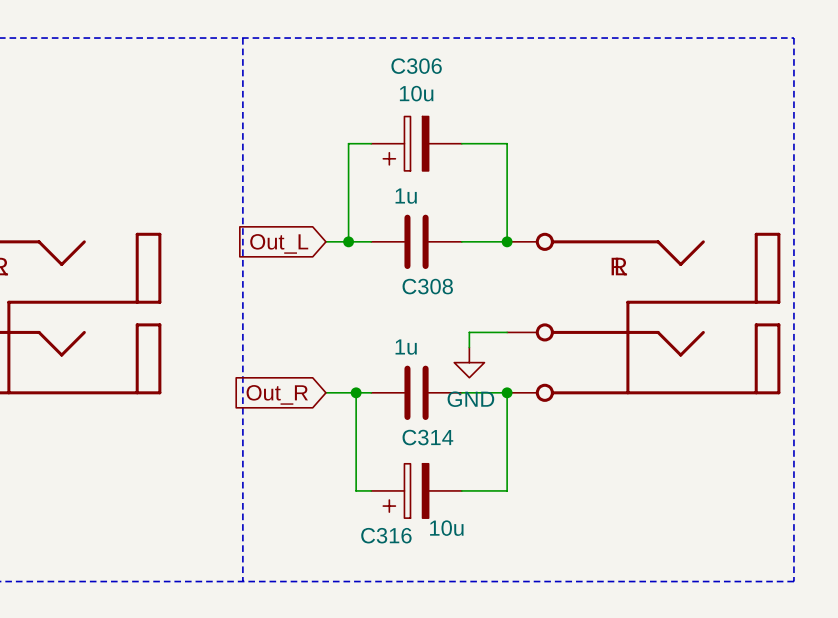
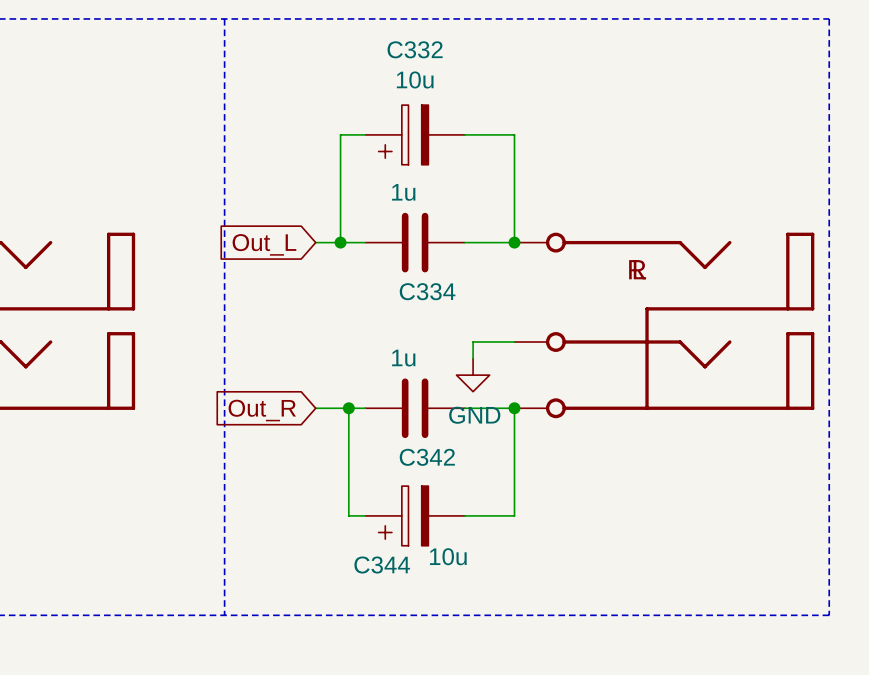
C306 name: C306 (416, 66) -> C332 (415, 49)
C308 name: C308 (427, 286) -> C334 (427, 291)
C314 name: C314 (427, 437) -> C342 (427, 457)
C316 name: C316 (386, 535) -> C344 (382, 565)

